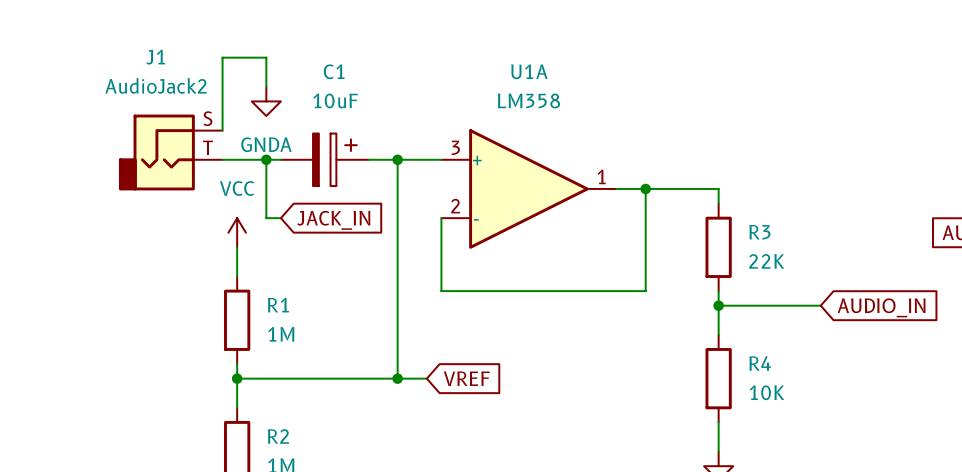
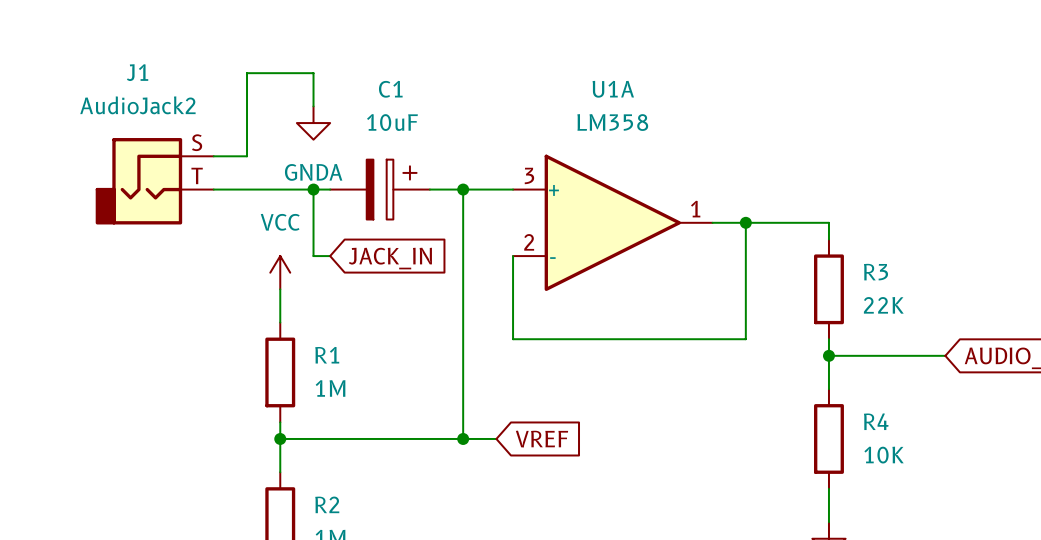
wire: (222, 57) (222, 130) -> (263, 73) (247, 73) (247, 156) (213, 156)
J1 position: (170, 152) -> (154, 181)

